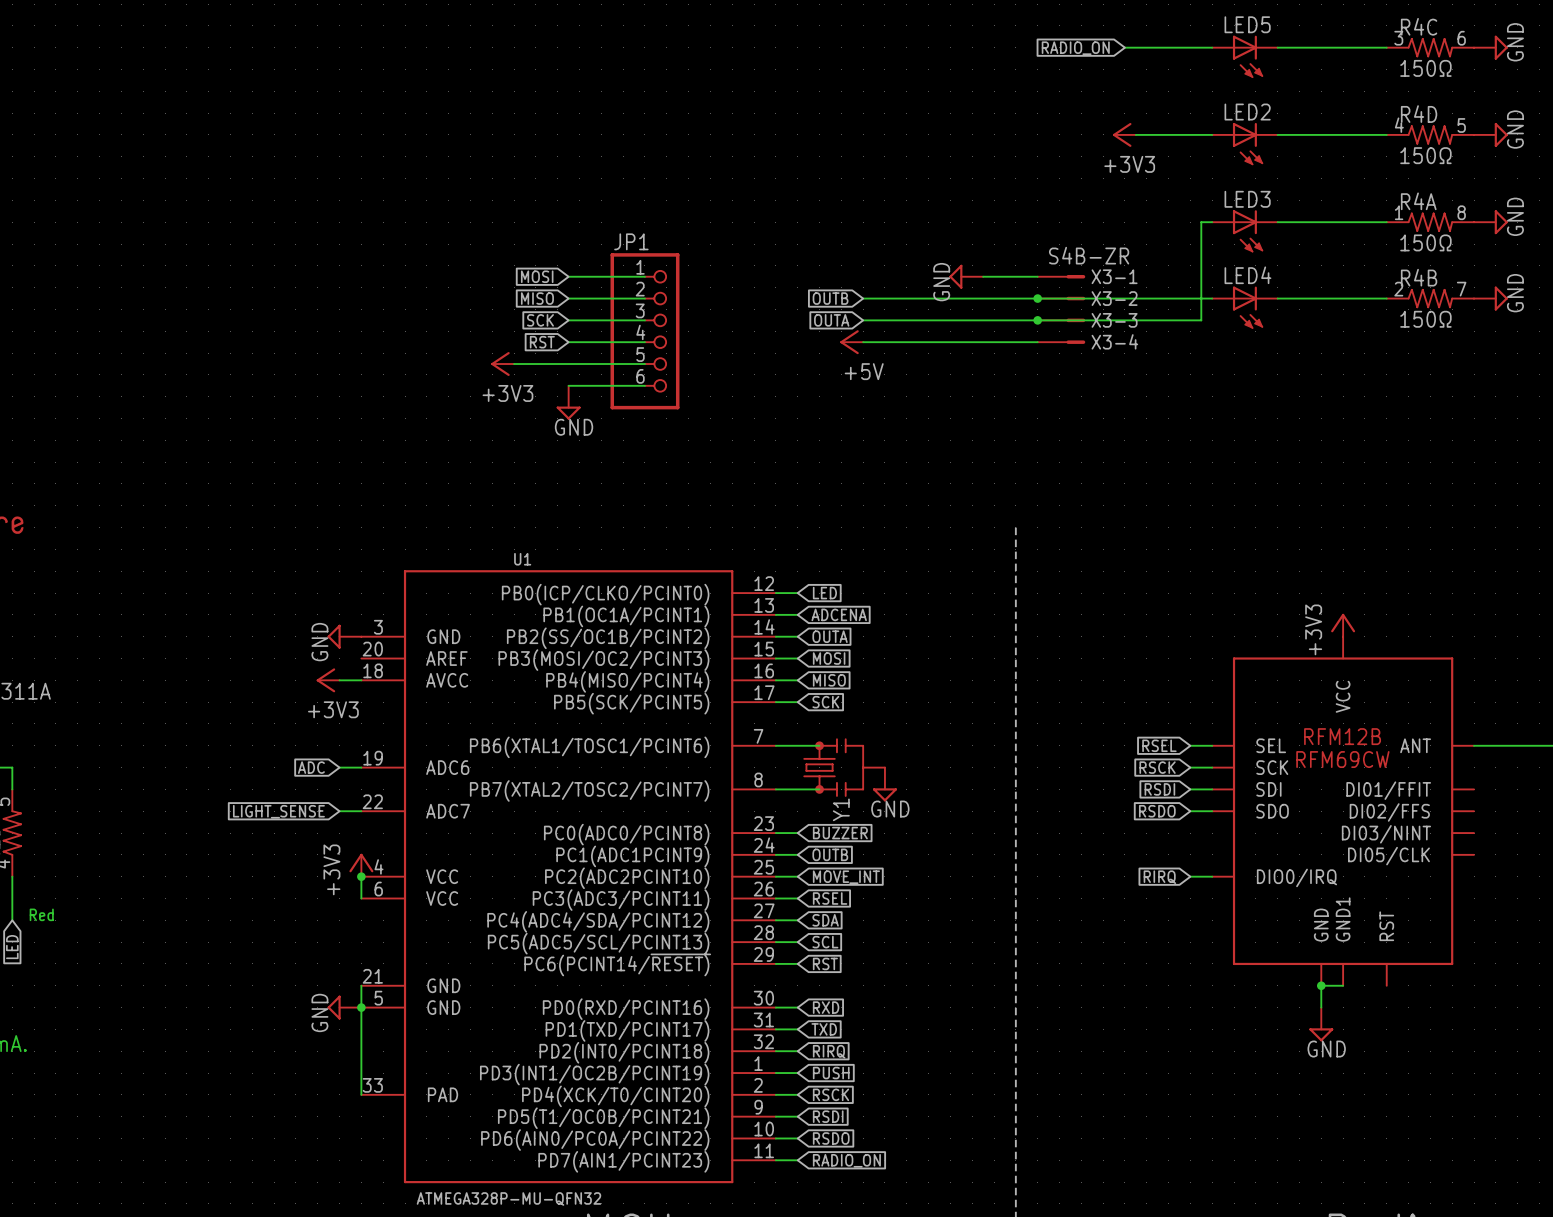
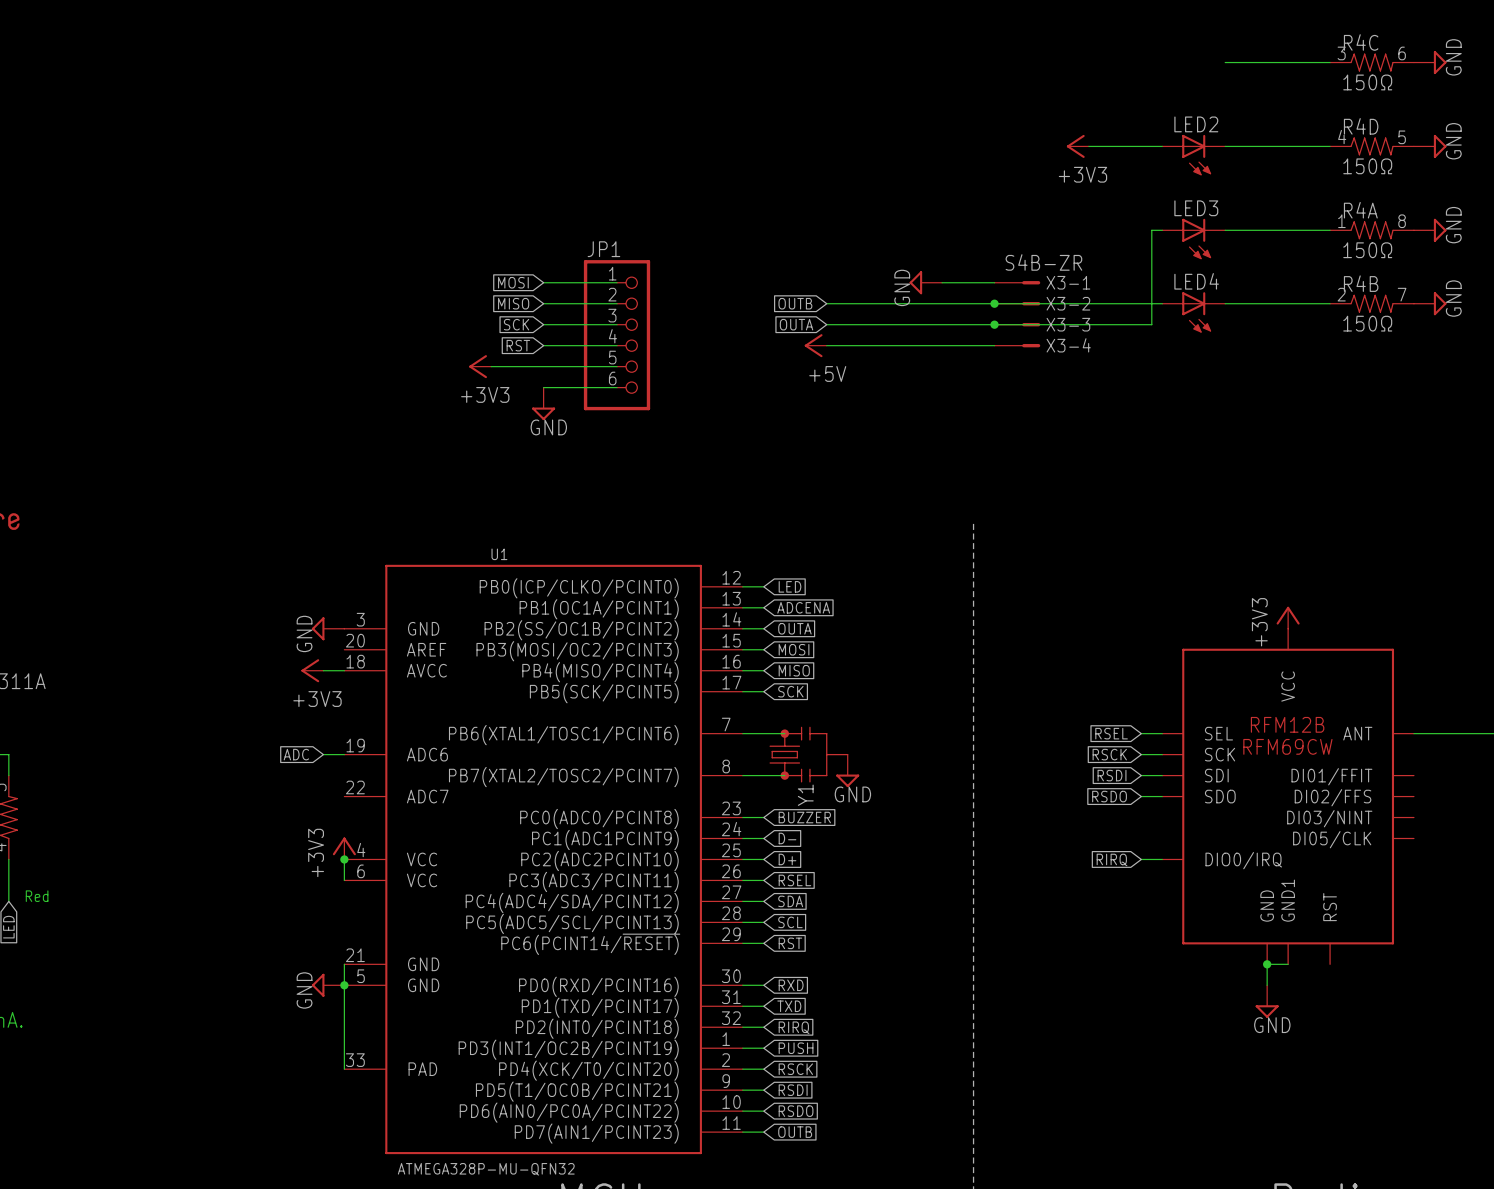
wire: (1124, 47) (1212, 47) -> none
global label: RADIO_ON (1075, 48) -> none
LED5: (1244, 56) -> none
global label: LIGHT_SENSE (278, 811) -> none
wire: (339, 811) (361, 811) -> none
global label: OUTB (830, 854) -> D- (787, 838)
global label: MOVE_INT (846, 877) -> D+ (787, 859)
global label: RADIO_ON (846, 1160) -> OUTB (795, 1132)

